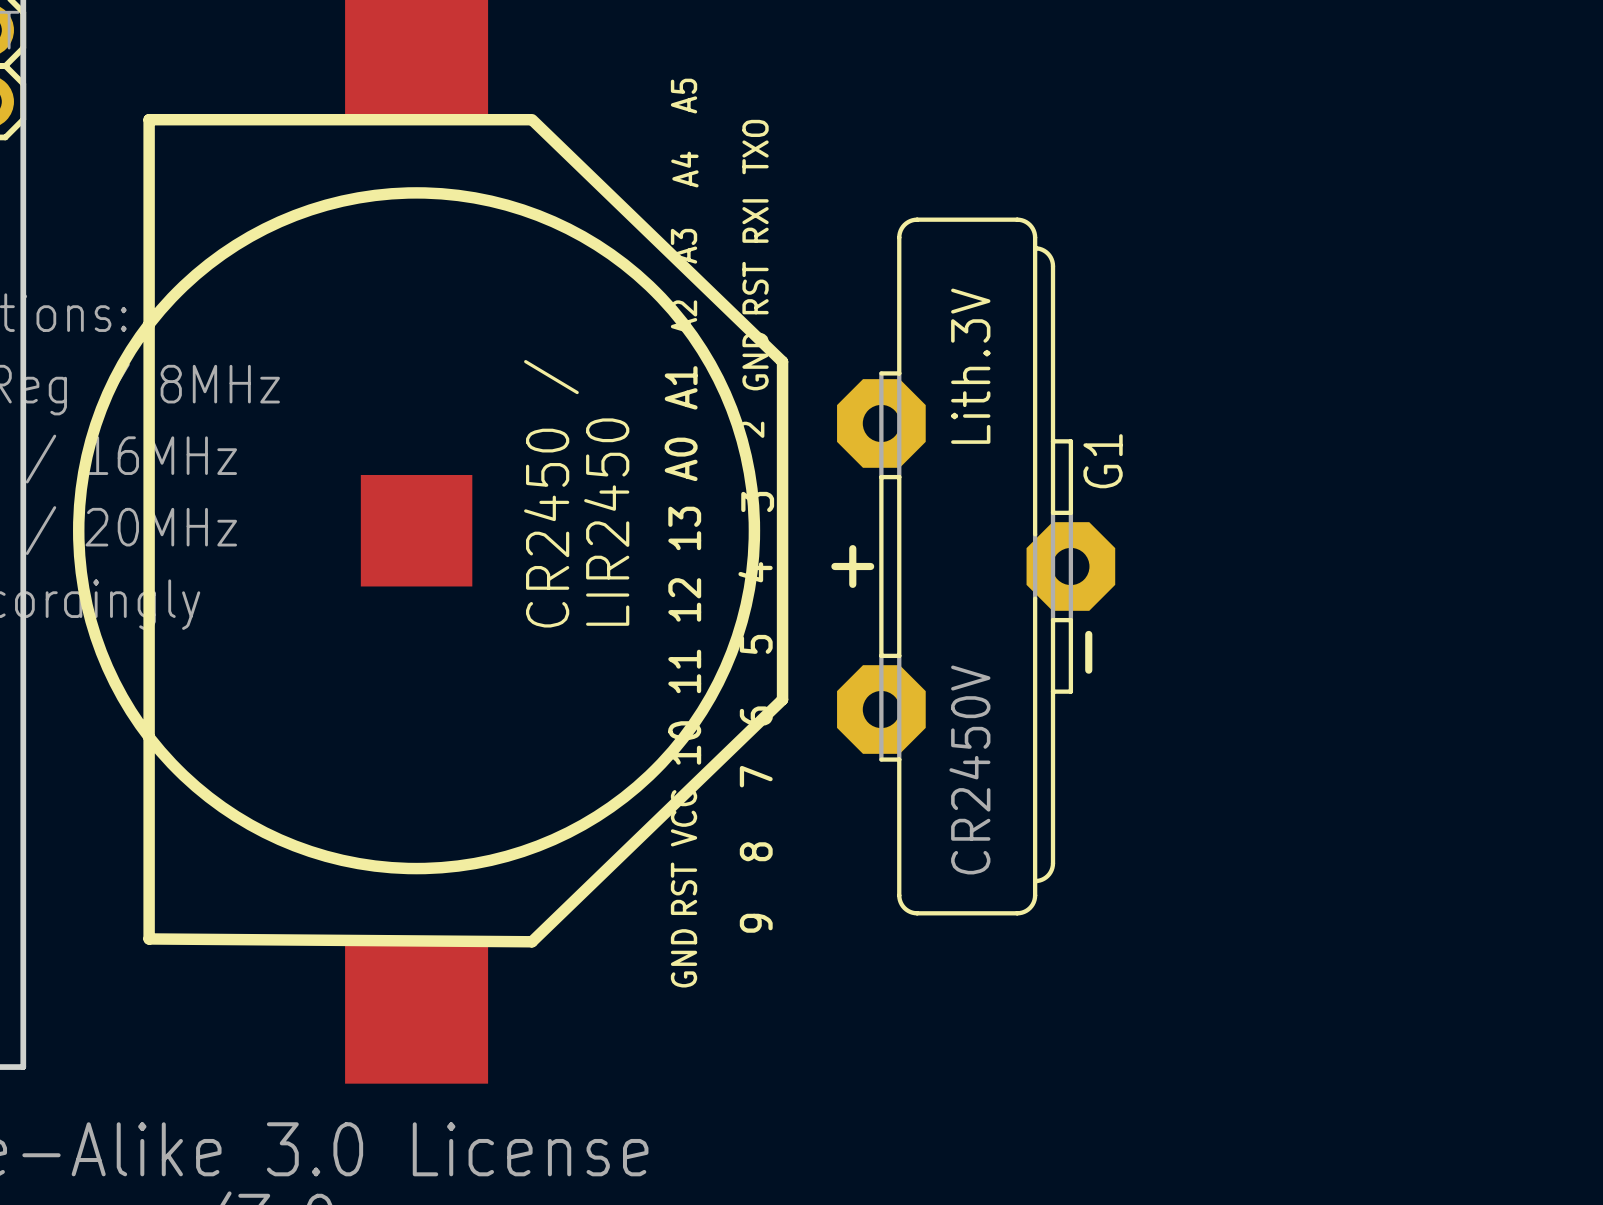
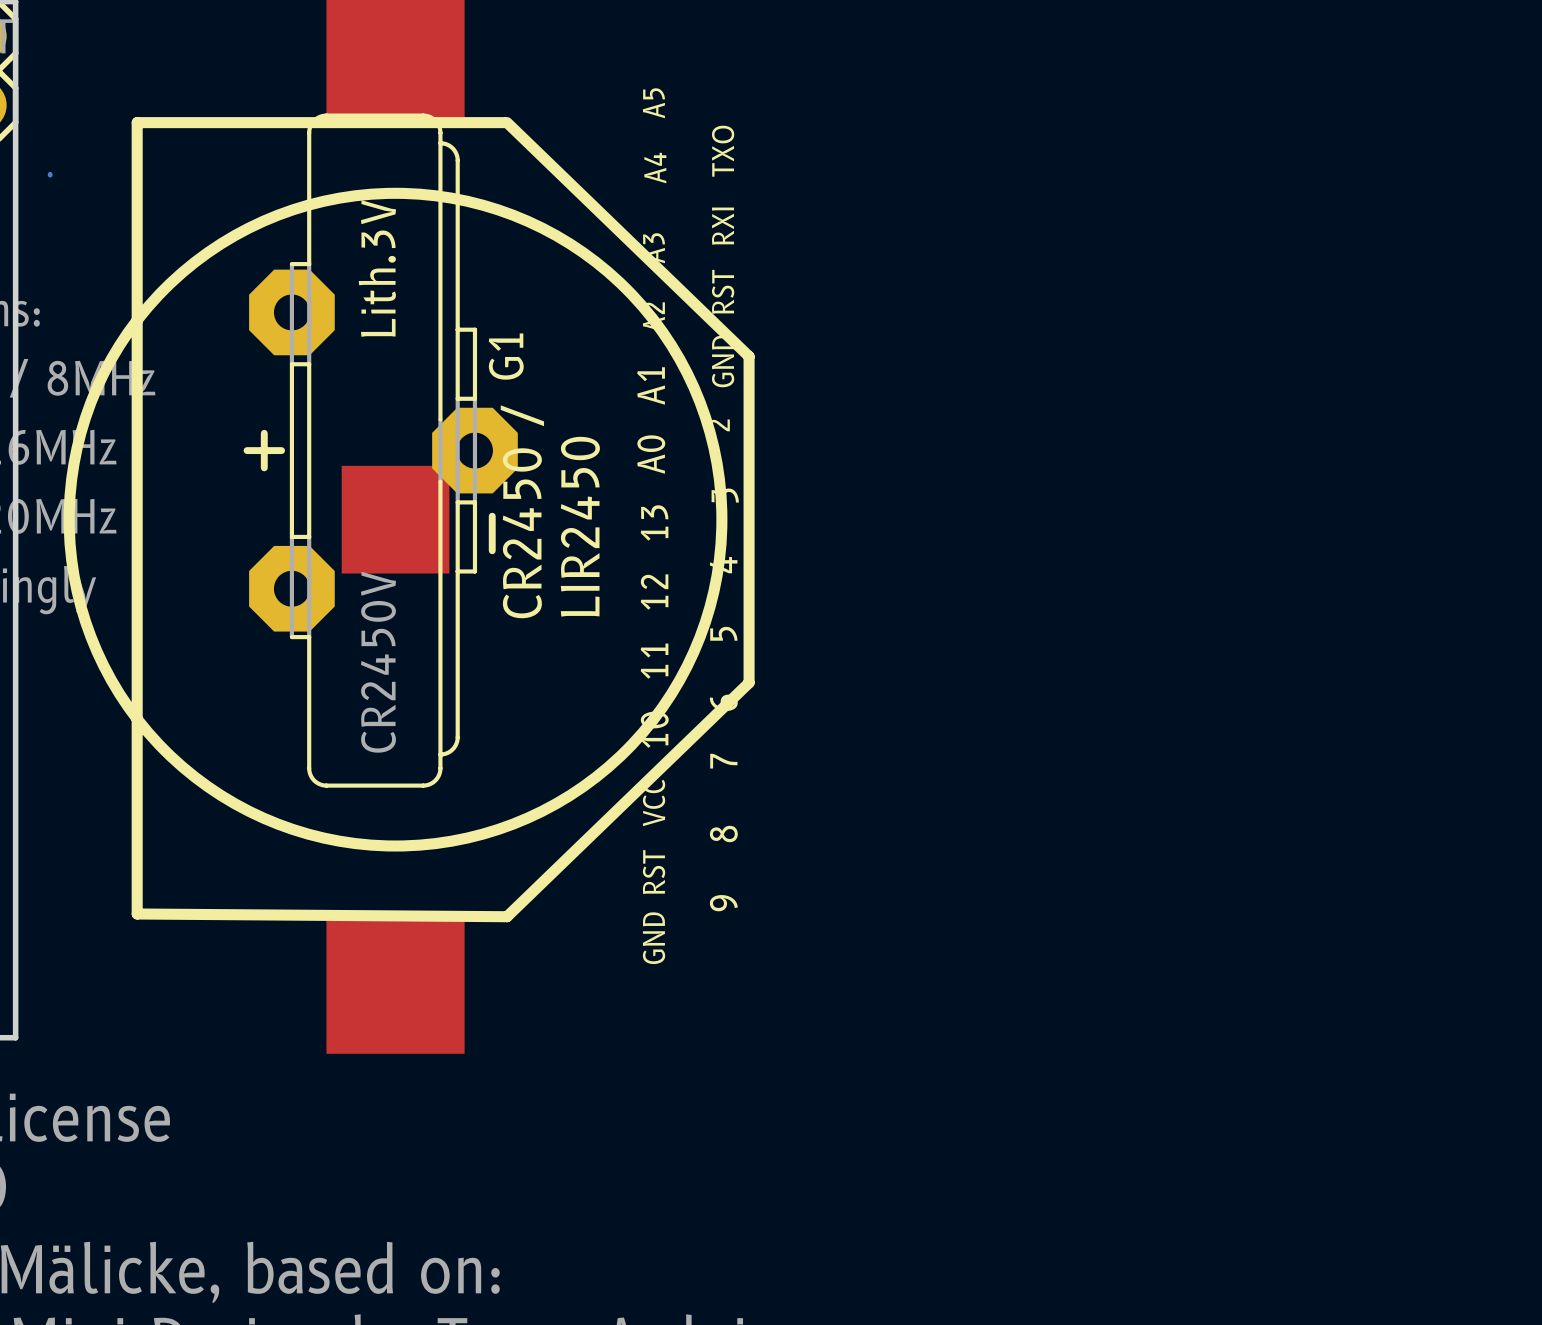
bottom track: none -> (50, 174) (50, 175)
G1 position: (973, 566) -> (380, 450)

